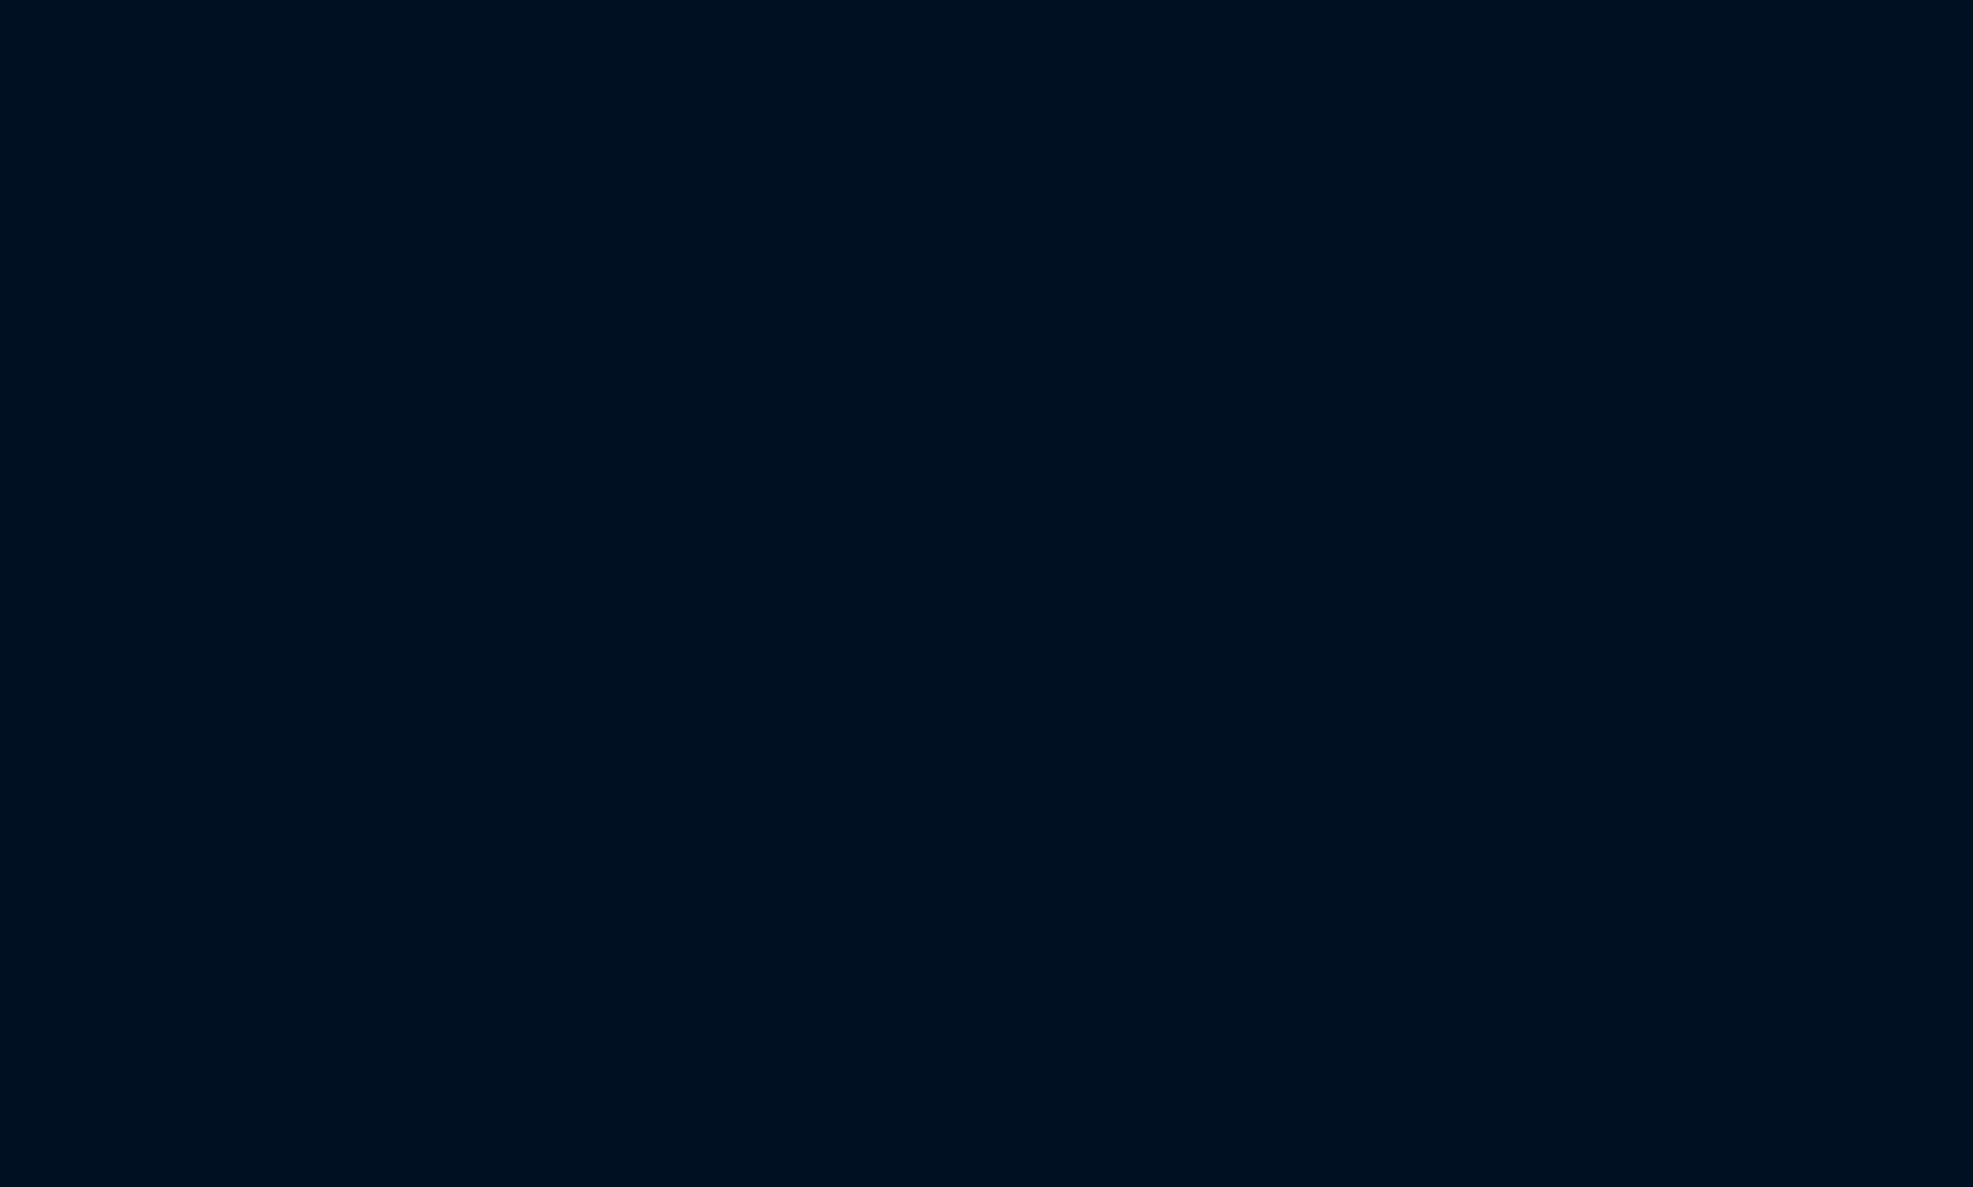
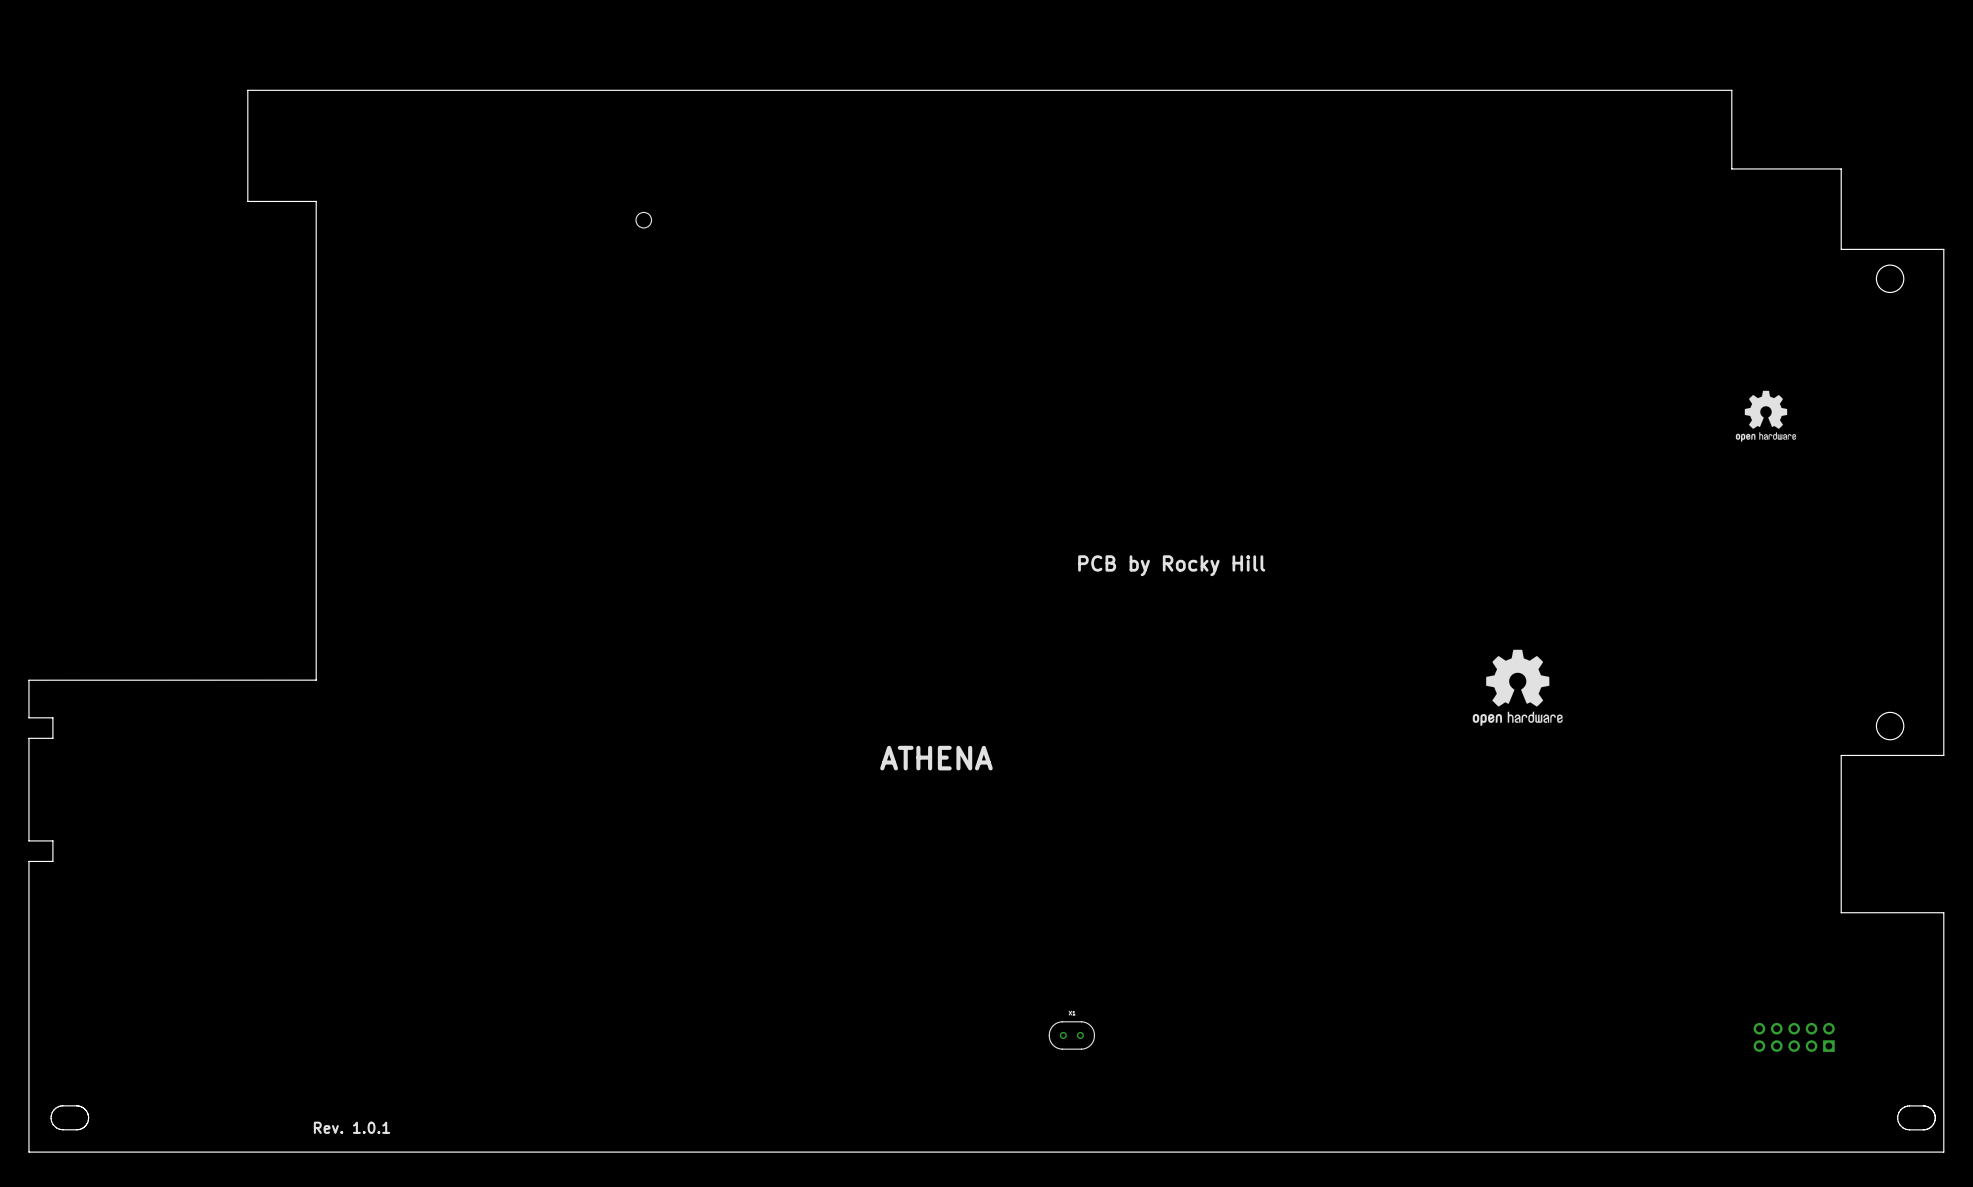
board edge: none -> (247, 90) (1731, 90) (1731, 168) (1841, 168) (1841, 249) (1943, 249) (1943, 755) (1841, 755) (1841, 912) (1943, 912) (1943, 1152) (28, 1152) (28, 861) (52, 861) (52, 840) (28, 840) (28, 738) (52, 738) (52, 717) (28, 717) (28, 680) (316, 680) (316, 201) (247, 201) (247, 90)
drawing: none -> [635, 212, 652, 229]
round board edge: none -> [1876, 264, 1904, 293]
drawing: none -> [1735, 390, 1797, 442]
text: none -> PCB by Rocky Hill (1171, 565)
drawing: none -> [1472, 649, 1563, 726]
round board edge: none -> [1876, 712, 1904, 740]
text: none -> ATHENA (936, 758)
part: none -> (1071, 1035)
part: none -> (1794, 1037)
board edge: none -> (62, 1105) (78, 1106) (84, 1108) (88, 1116) (85, 1125) (77, 1129) (56, 1127) (51, 1121) (52, 1112) (55, 1108) (62, 1105)
board edge: none -> (1909, 1105) (1925, 1106) (1931, 1109) (1935, 1116) (1932, 1125) (1924, 1129) (1902, 1127) (1898, 1121) (1898, 1112) (1902, 1108) (1909, 1105)
text: none -> Rev. 1.0.1 (352, 1127)

